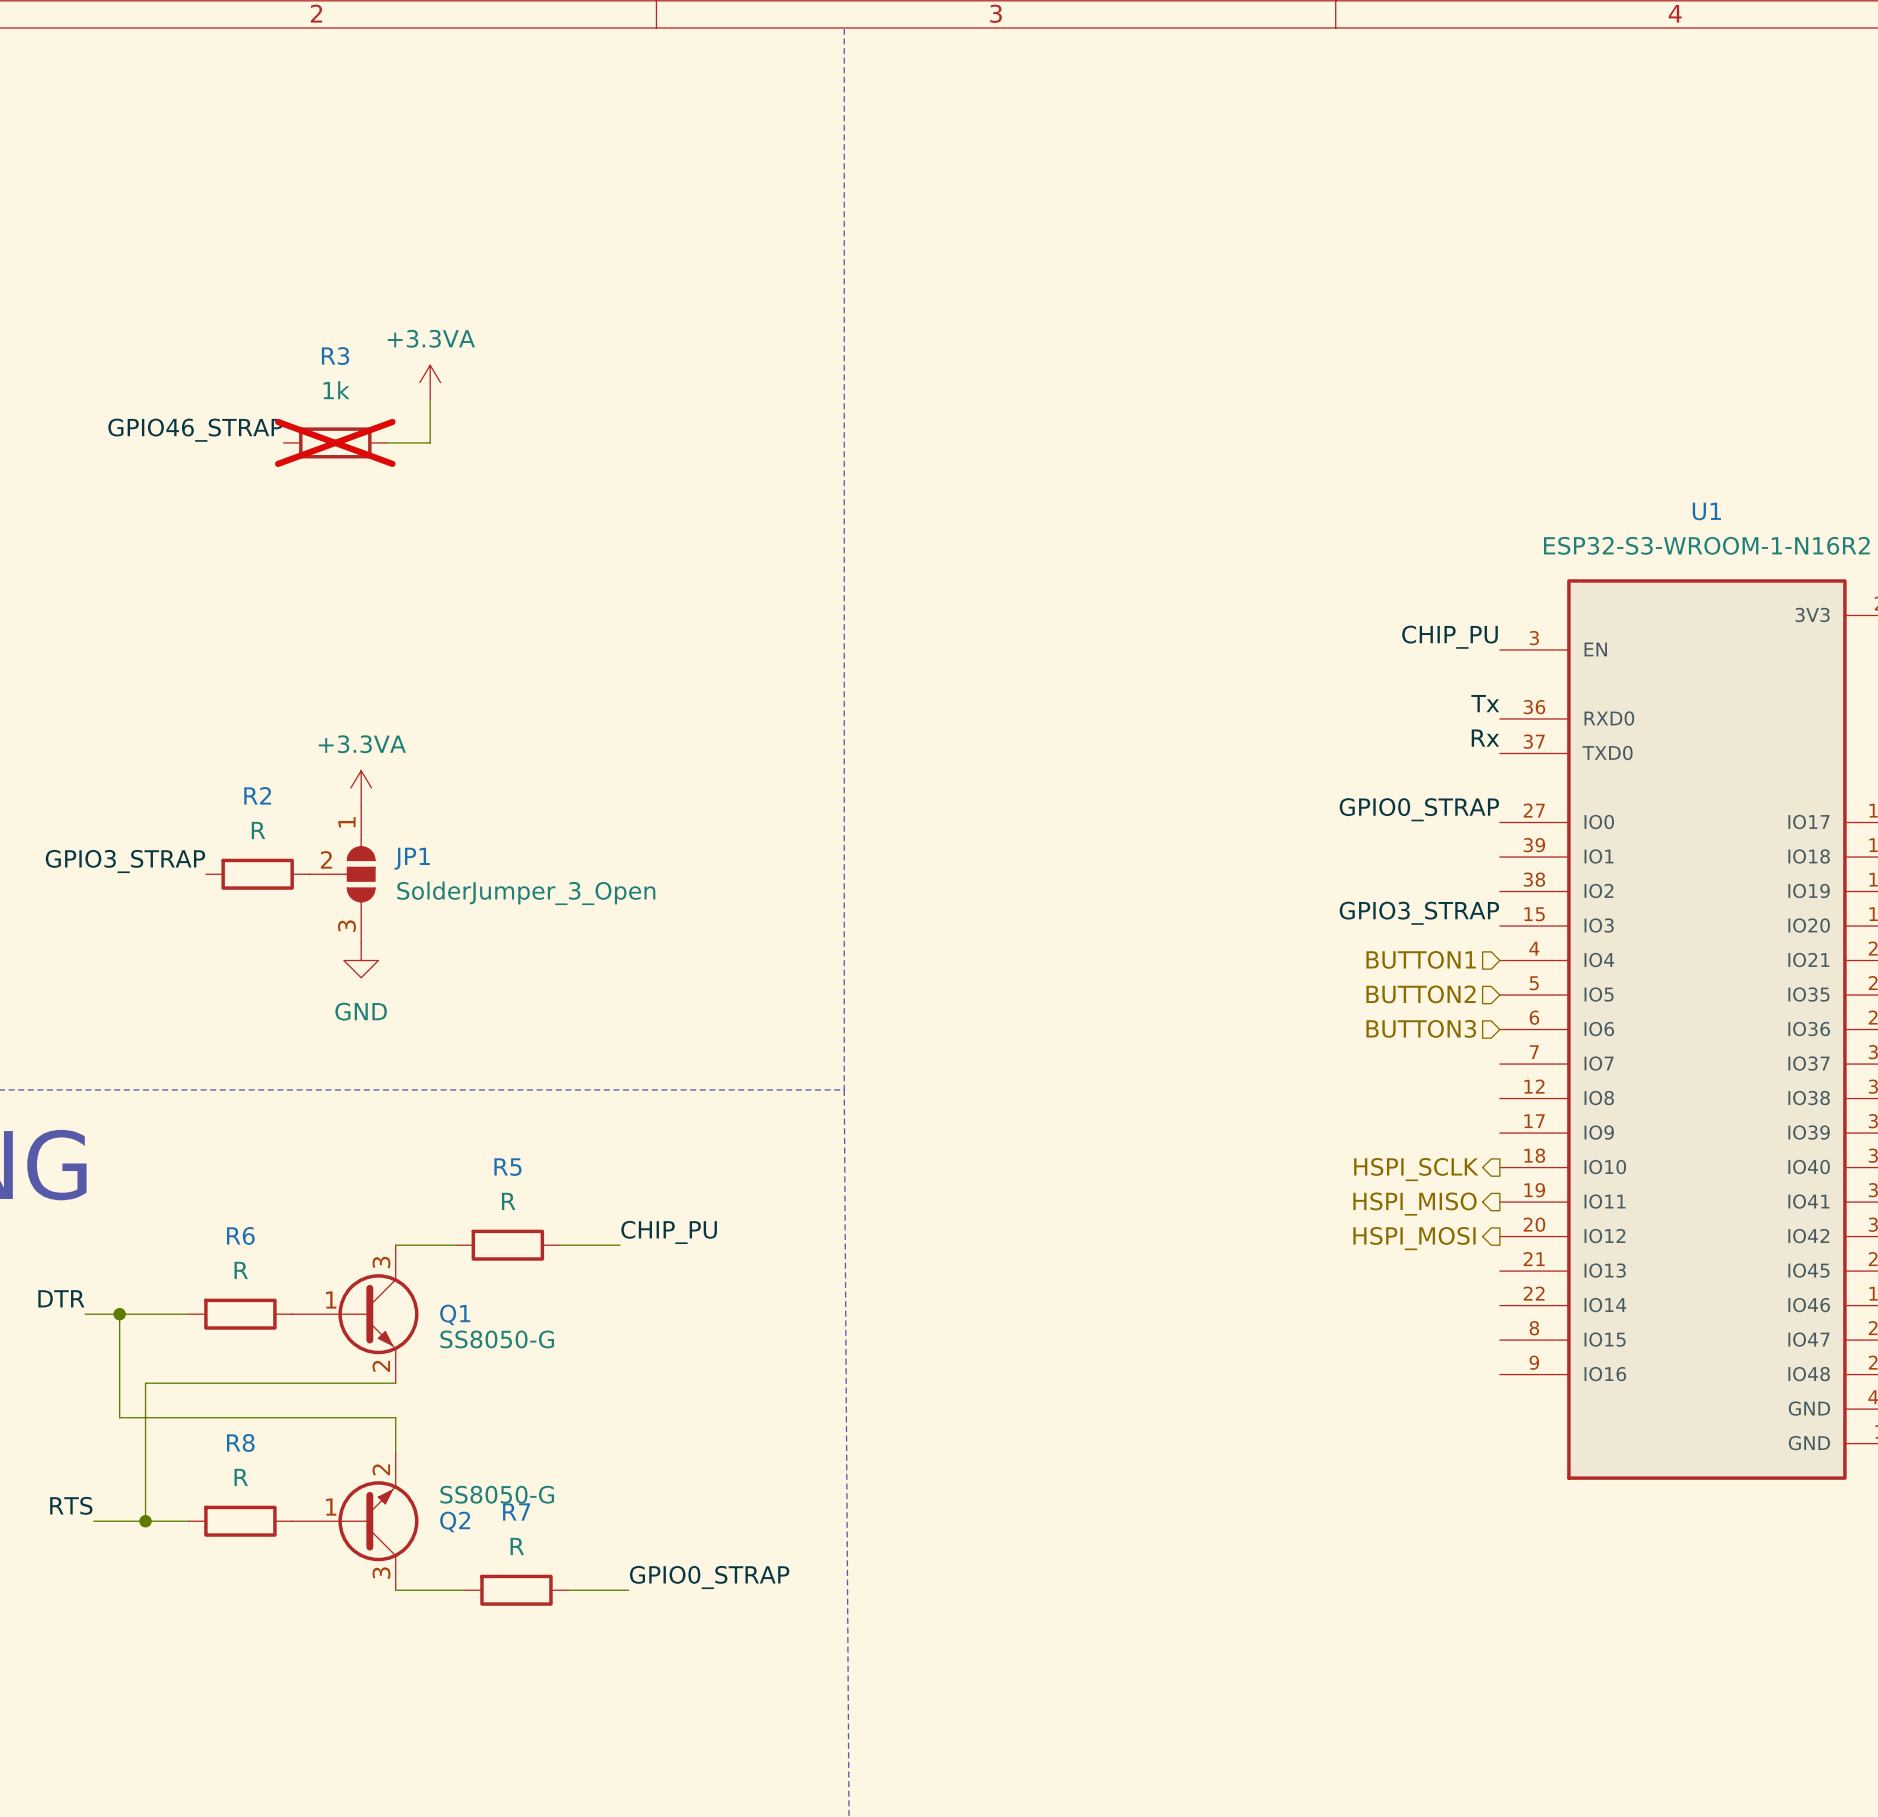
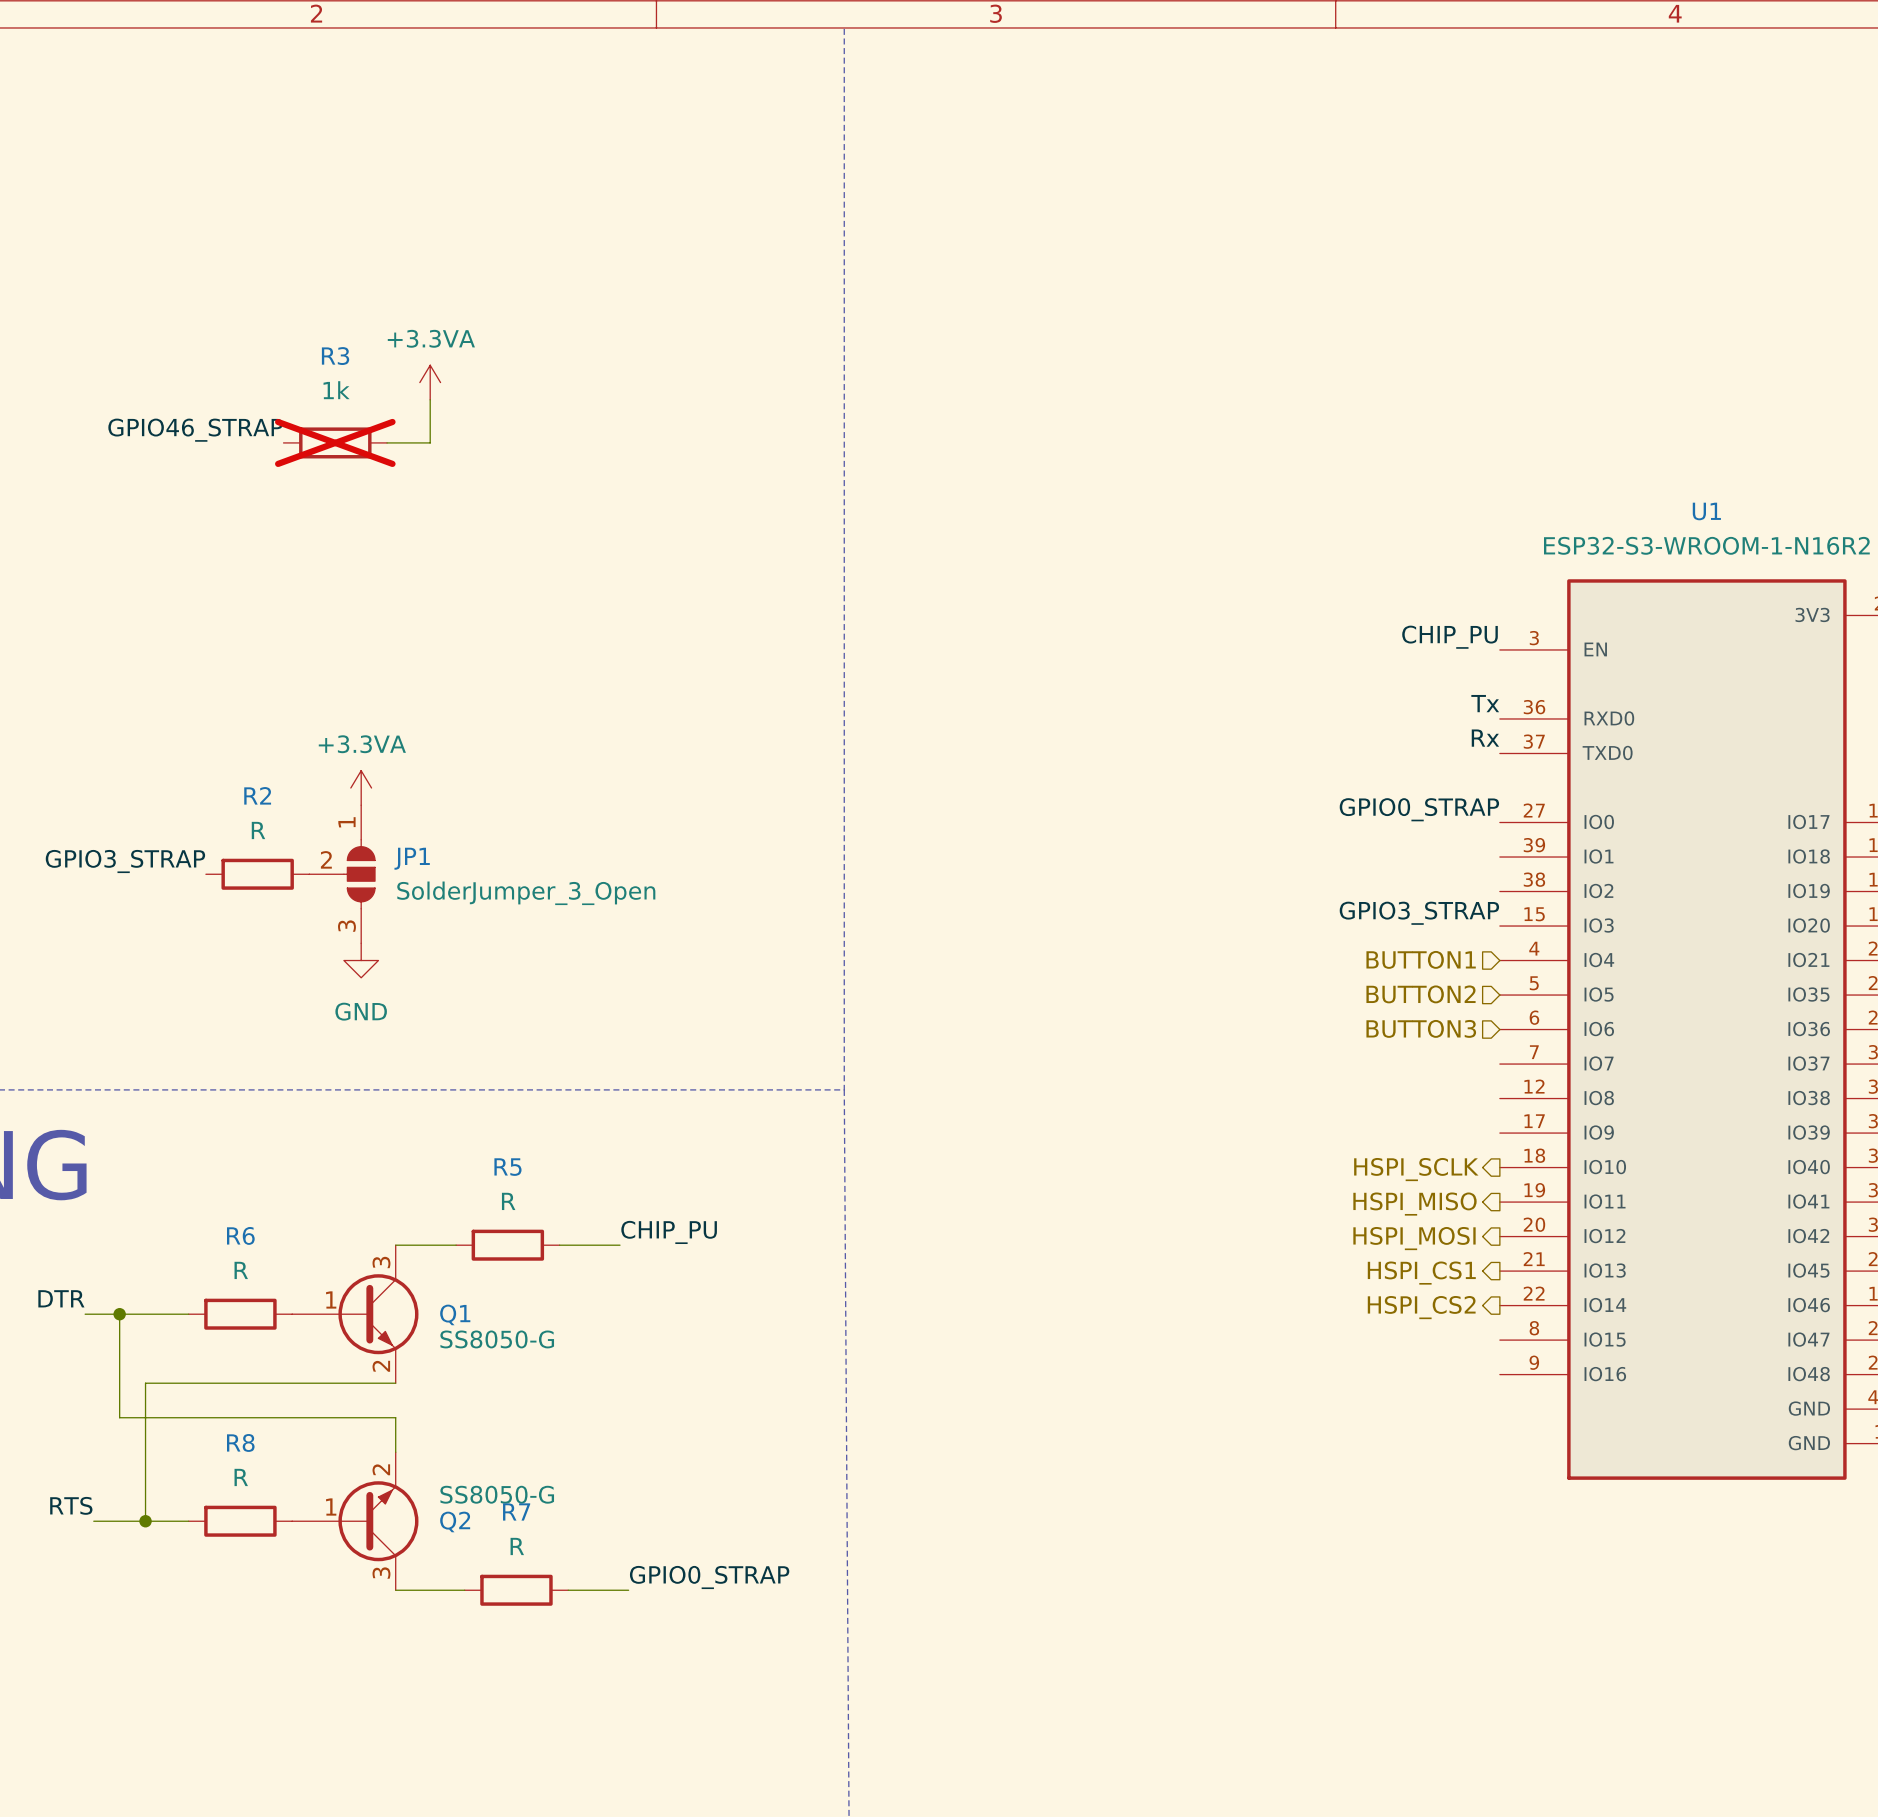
hierarchical label: none -> HSPI_CS1 (1421, 1273)
hierarchical label: none -> HSPI_CS2 (1421, 1307)

